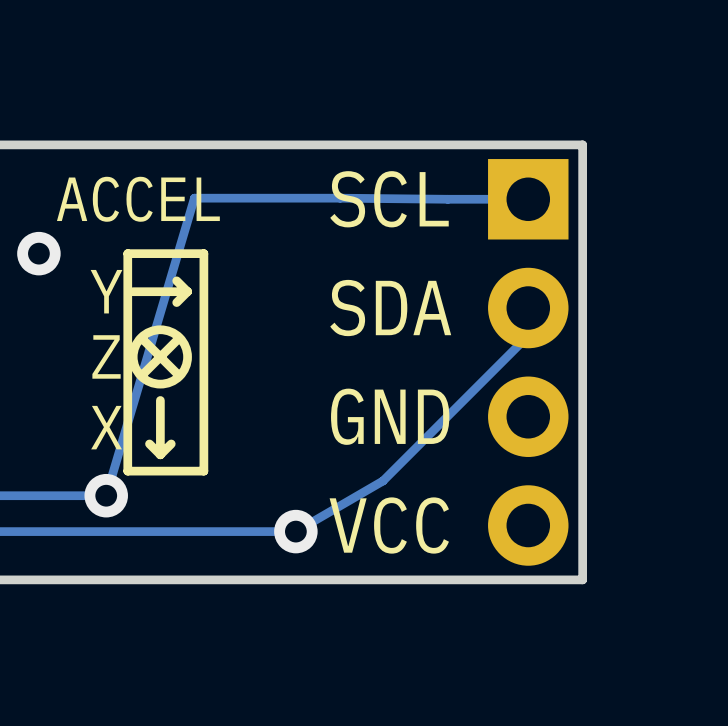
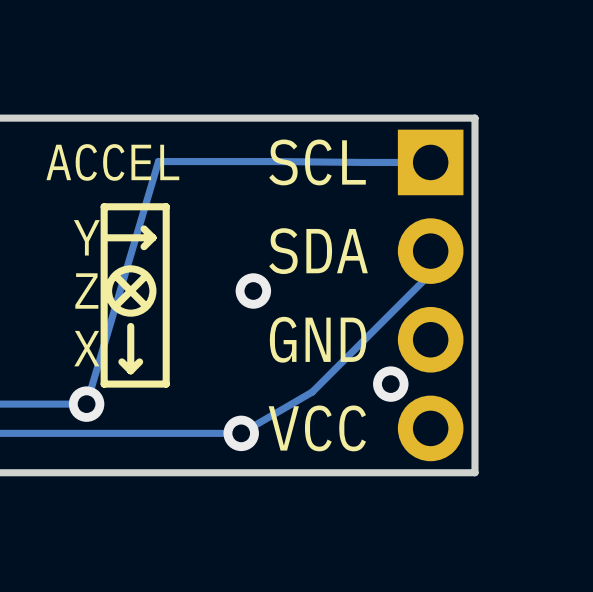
via: (38, 253) -> none
via: none -> (253, 291)
via: none -> (390, 384)

